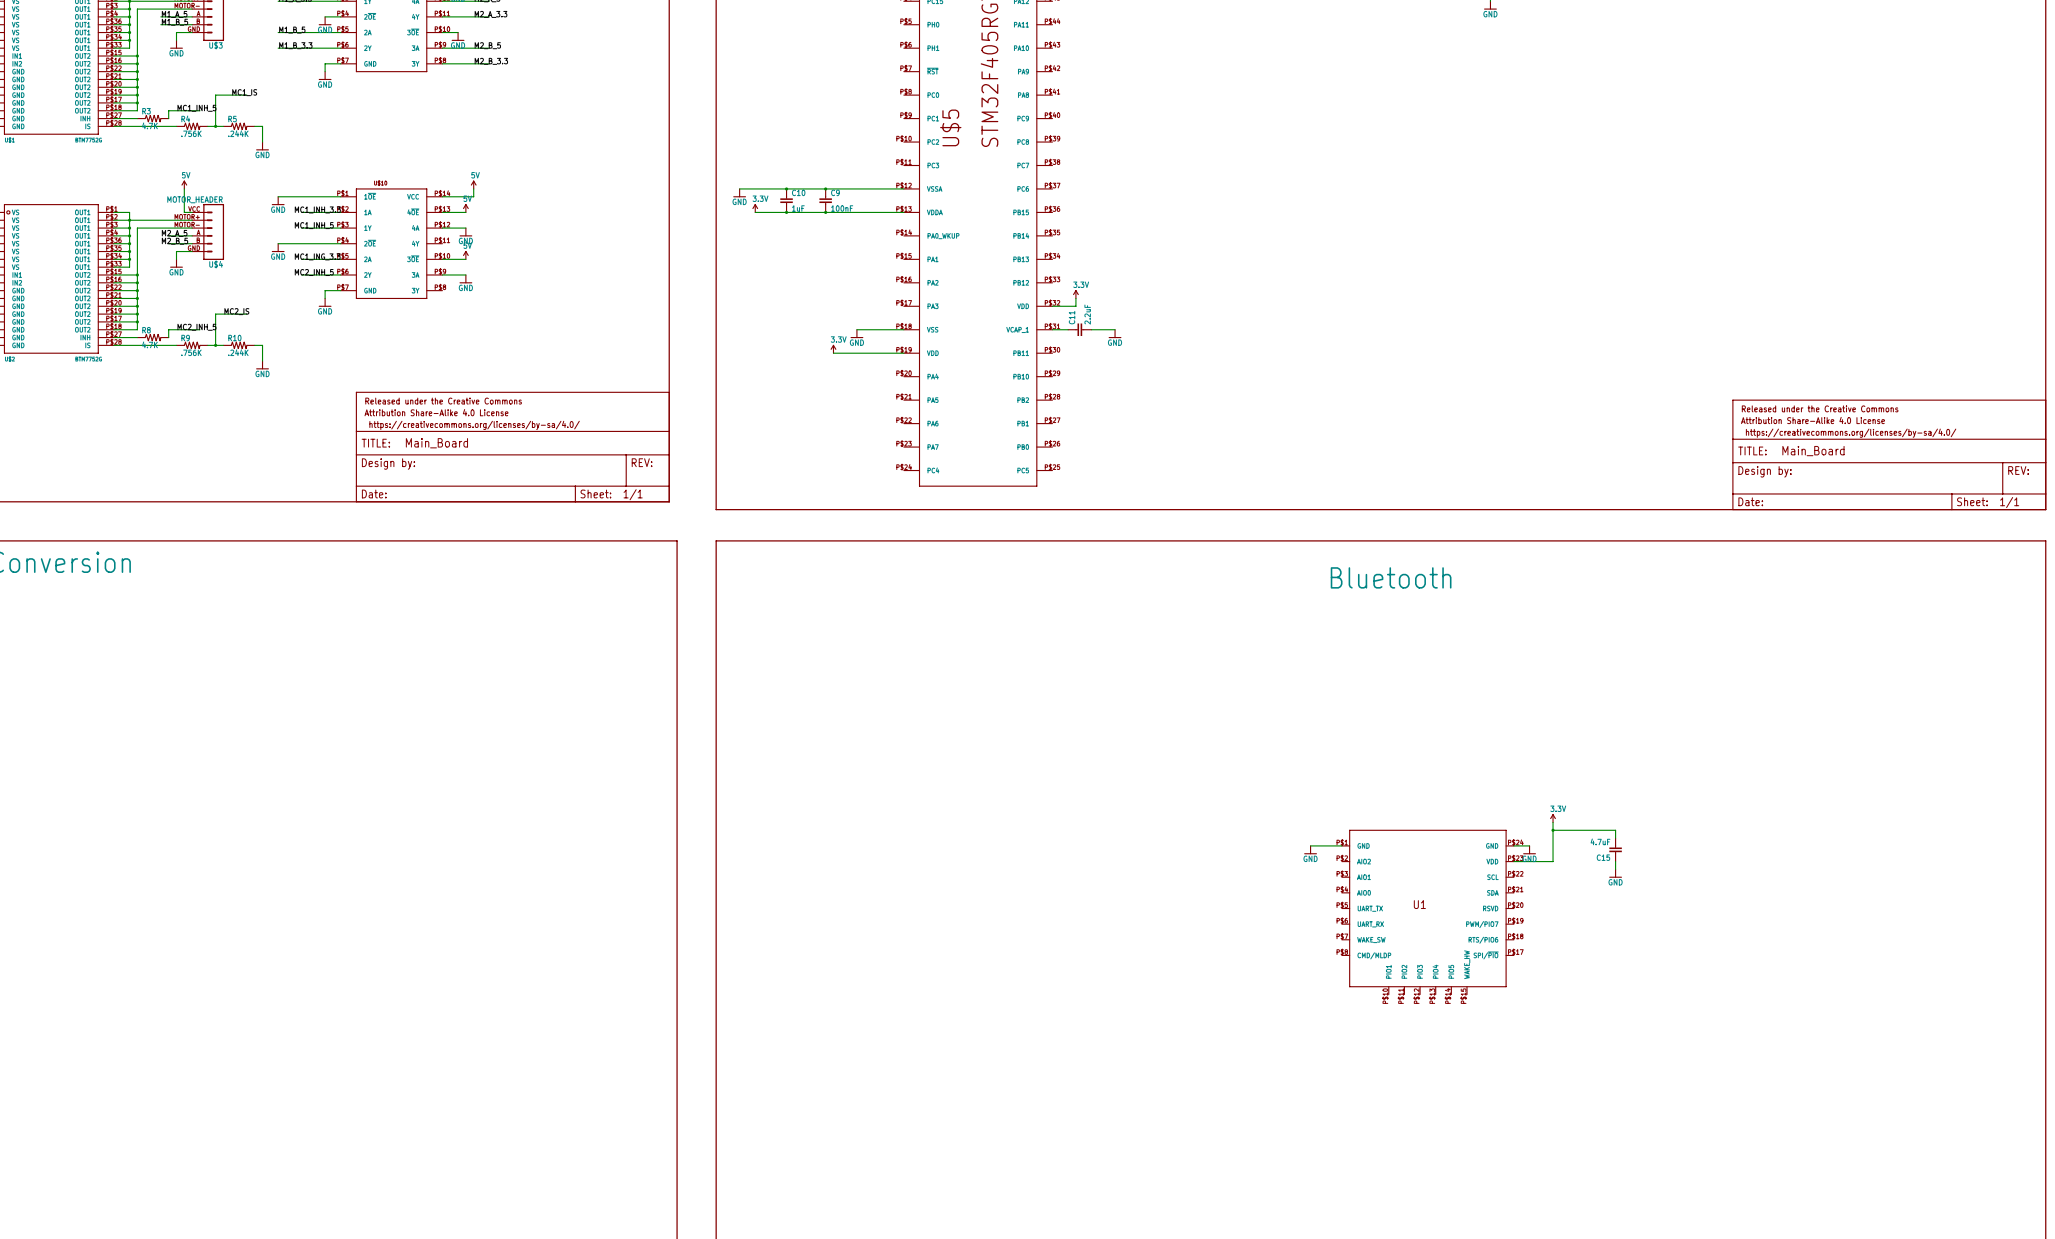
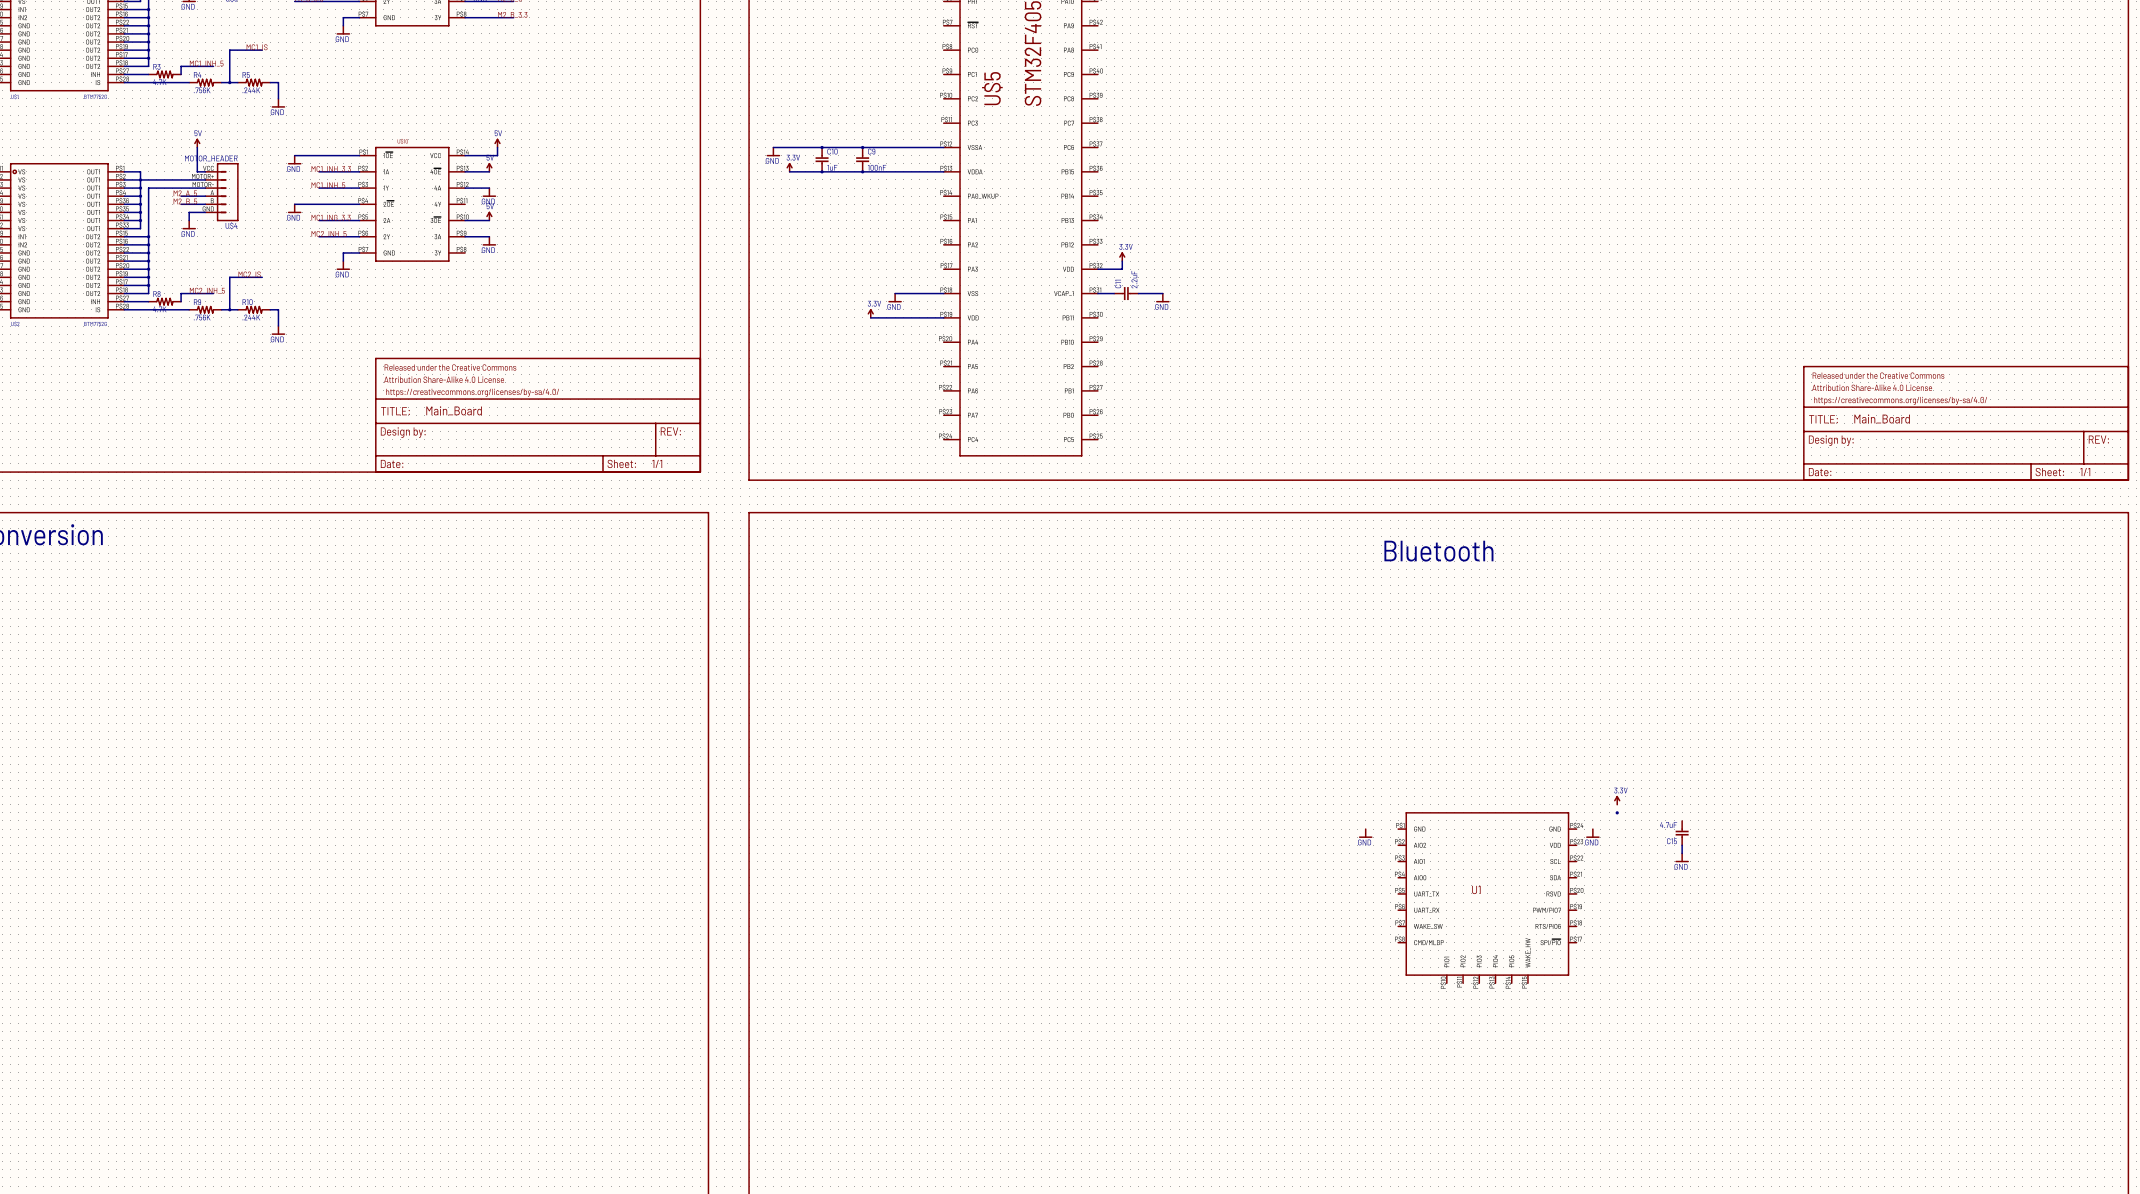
wire: (1553, 822) (1553, 861) (1513, 861) -> none
wire: (1553, 830) (1615, 830) (1615, 838) -> none
wire: (1310, 845) (1341, 845) -> none
wire: (1513, 845) (1529, 845) -> none

